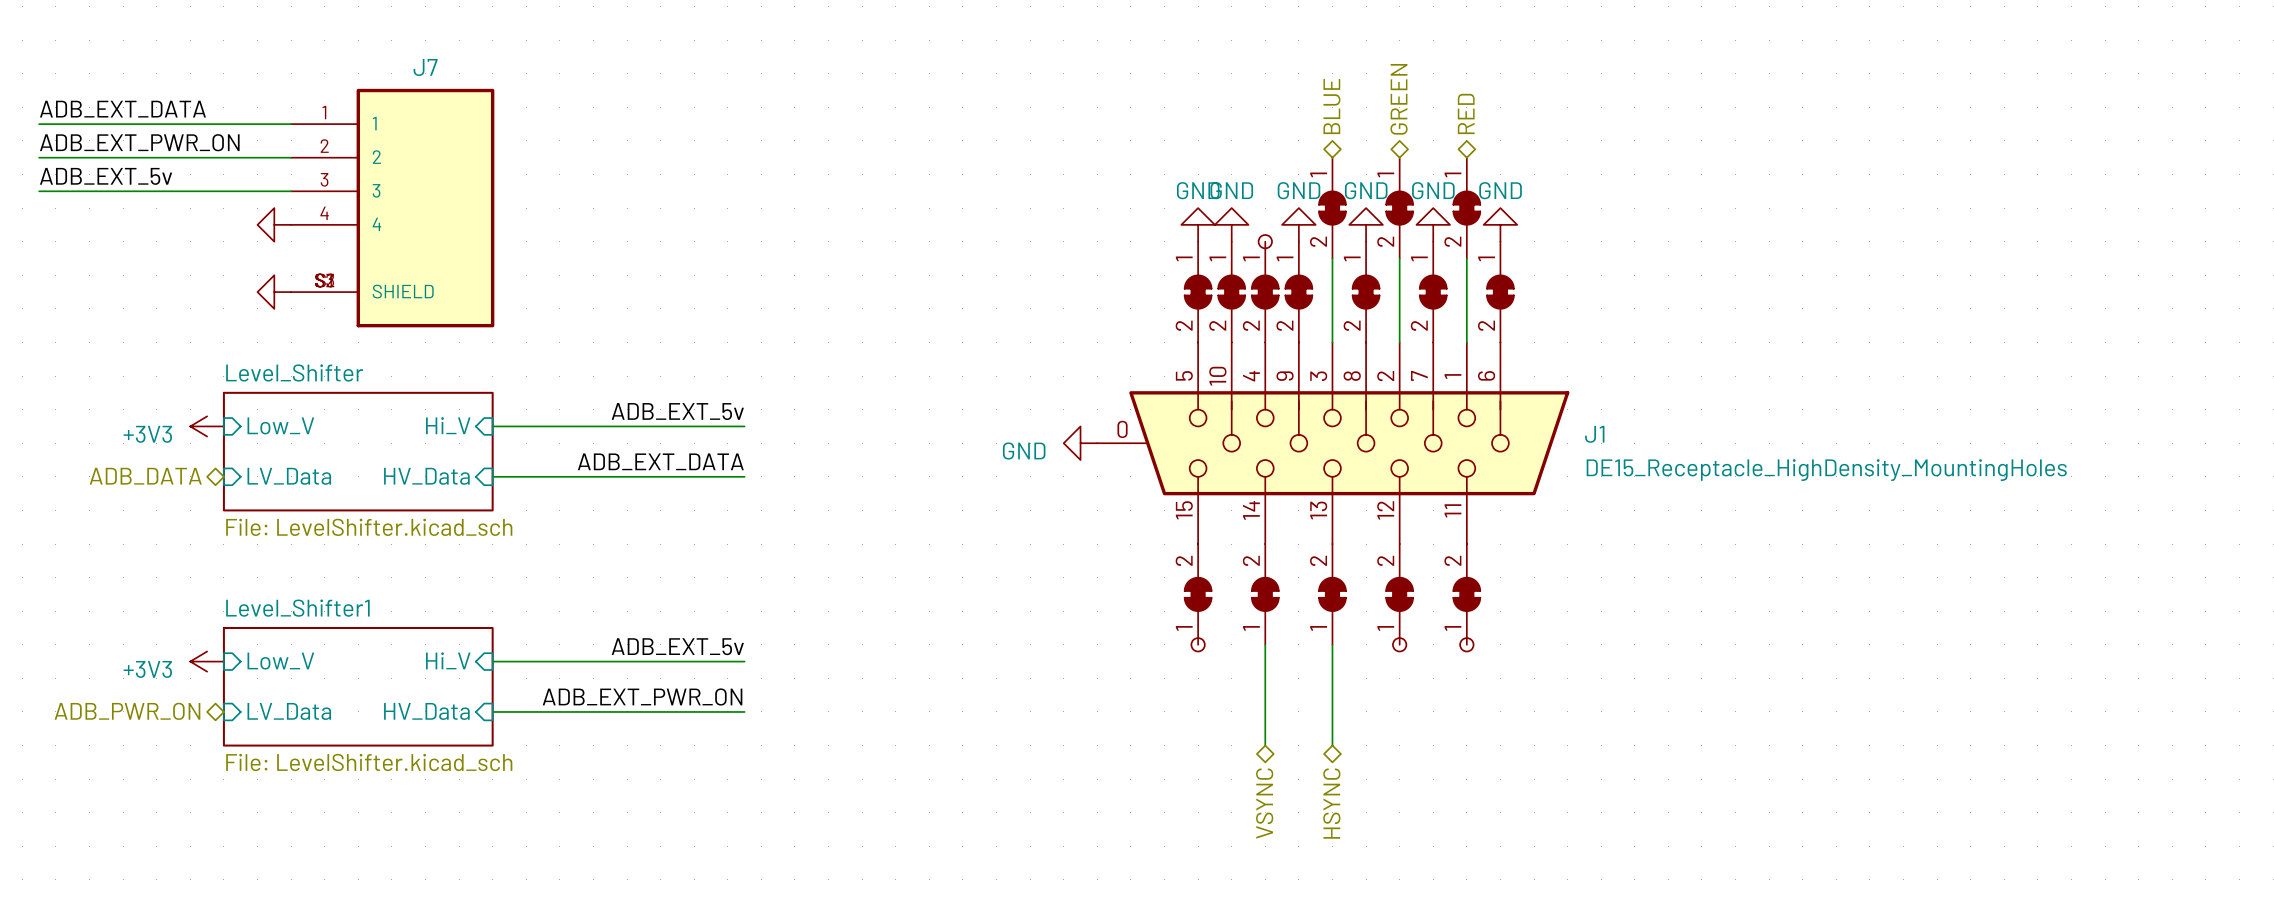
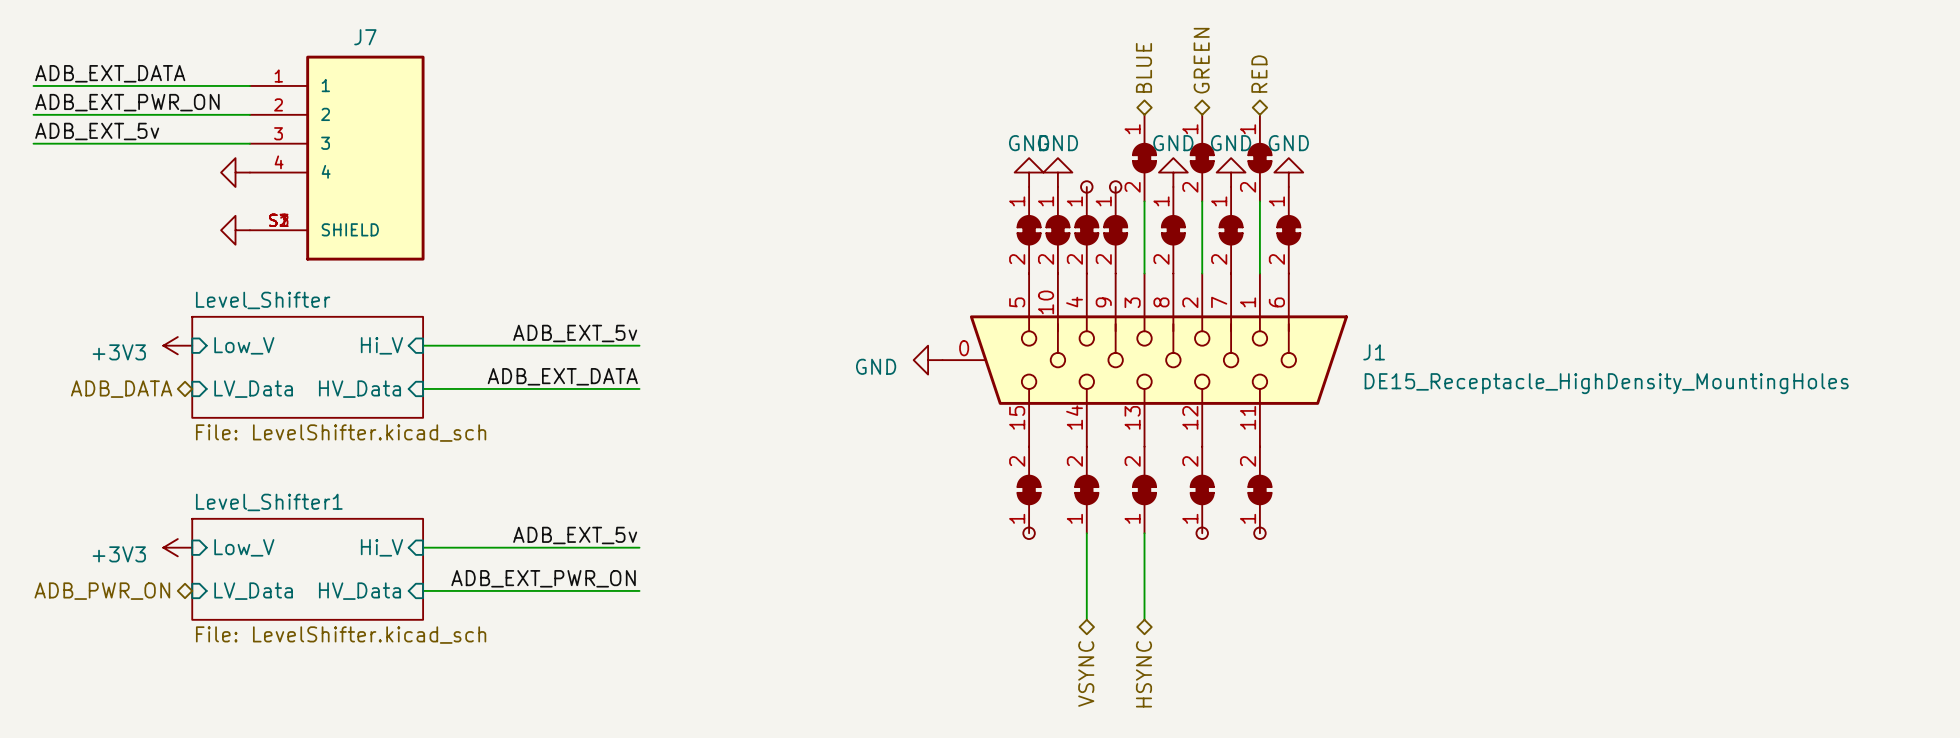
power symbol: GND (1298, 224) -> none
part: none -> (1115, 186)

